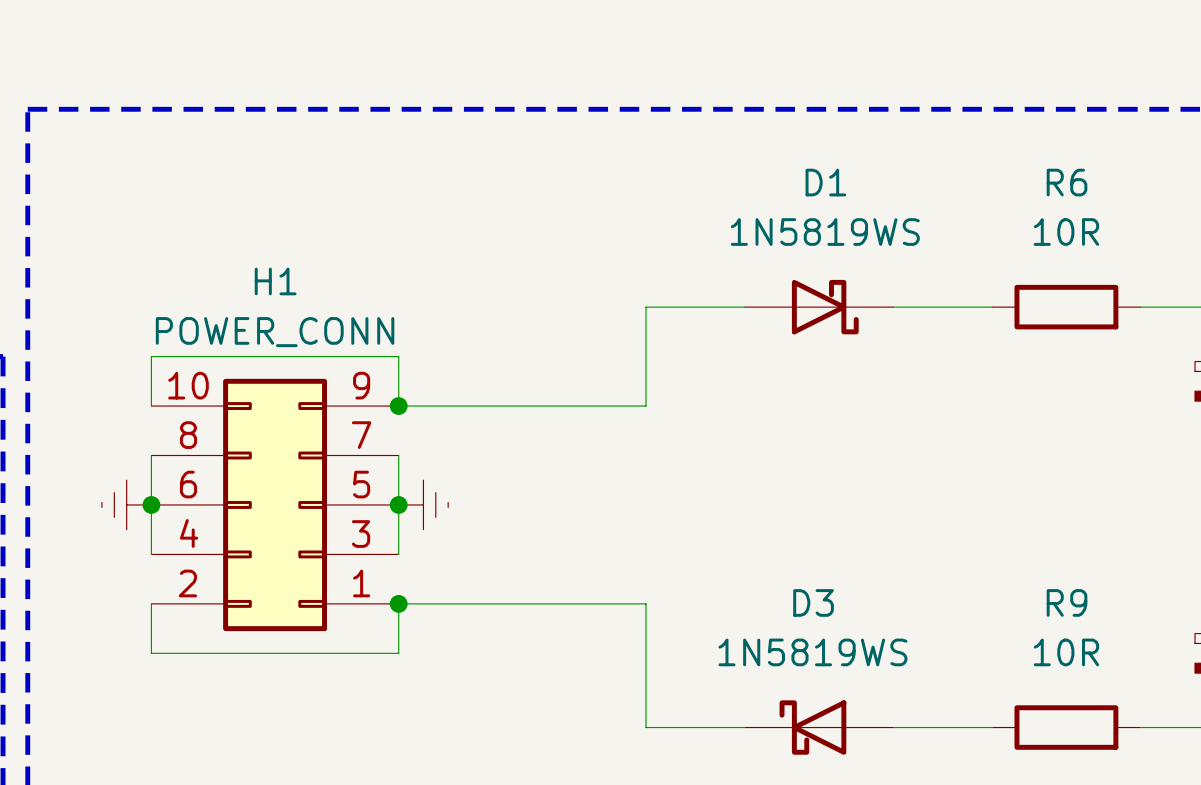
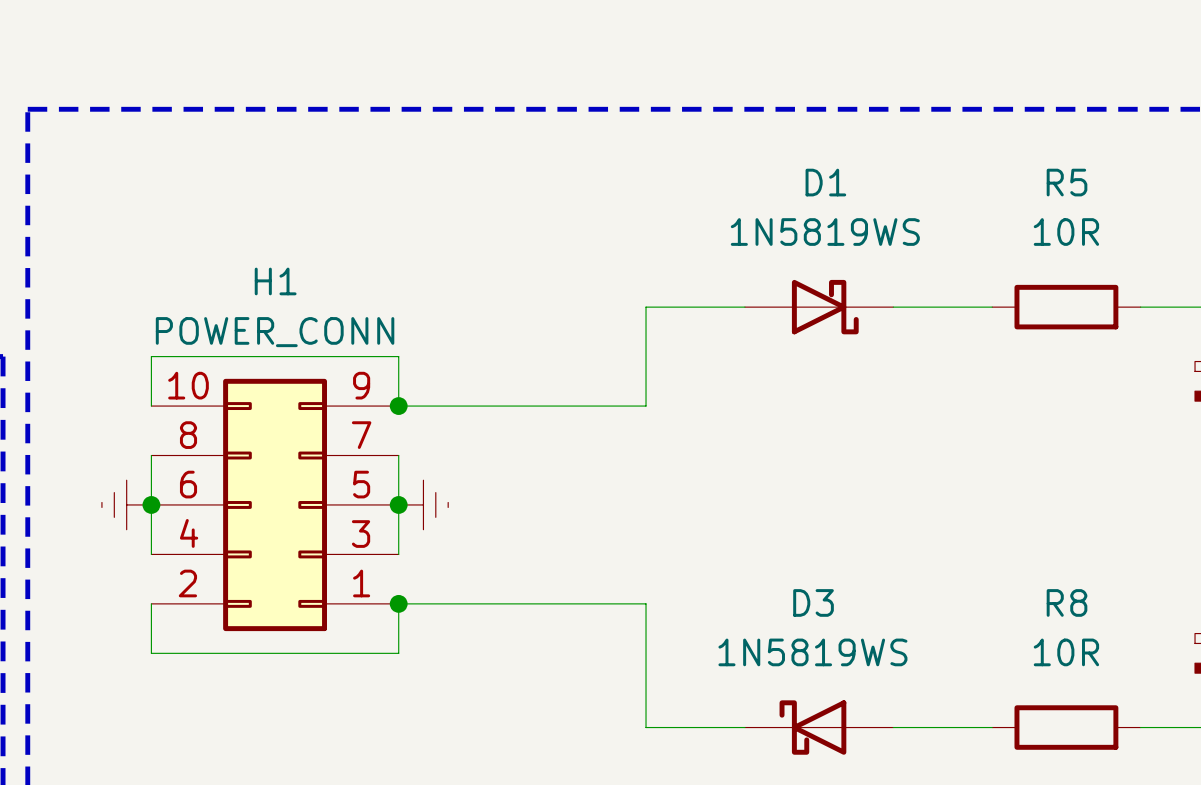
R6 name: R6 (1067, 182) -> R5 (1067, 182)
R9 name: R9 (1067, 602) -> R8 (1067, 602)

